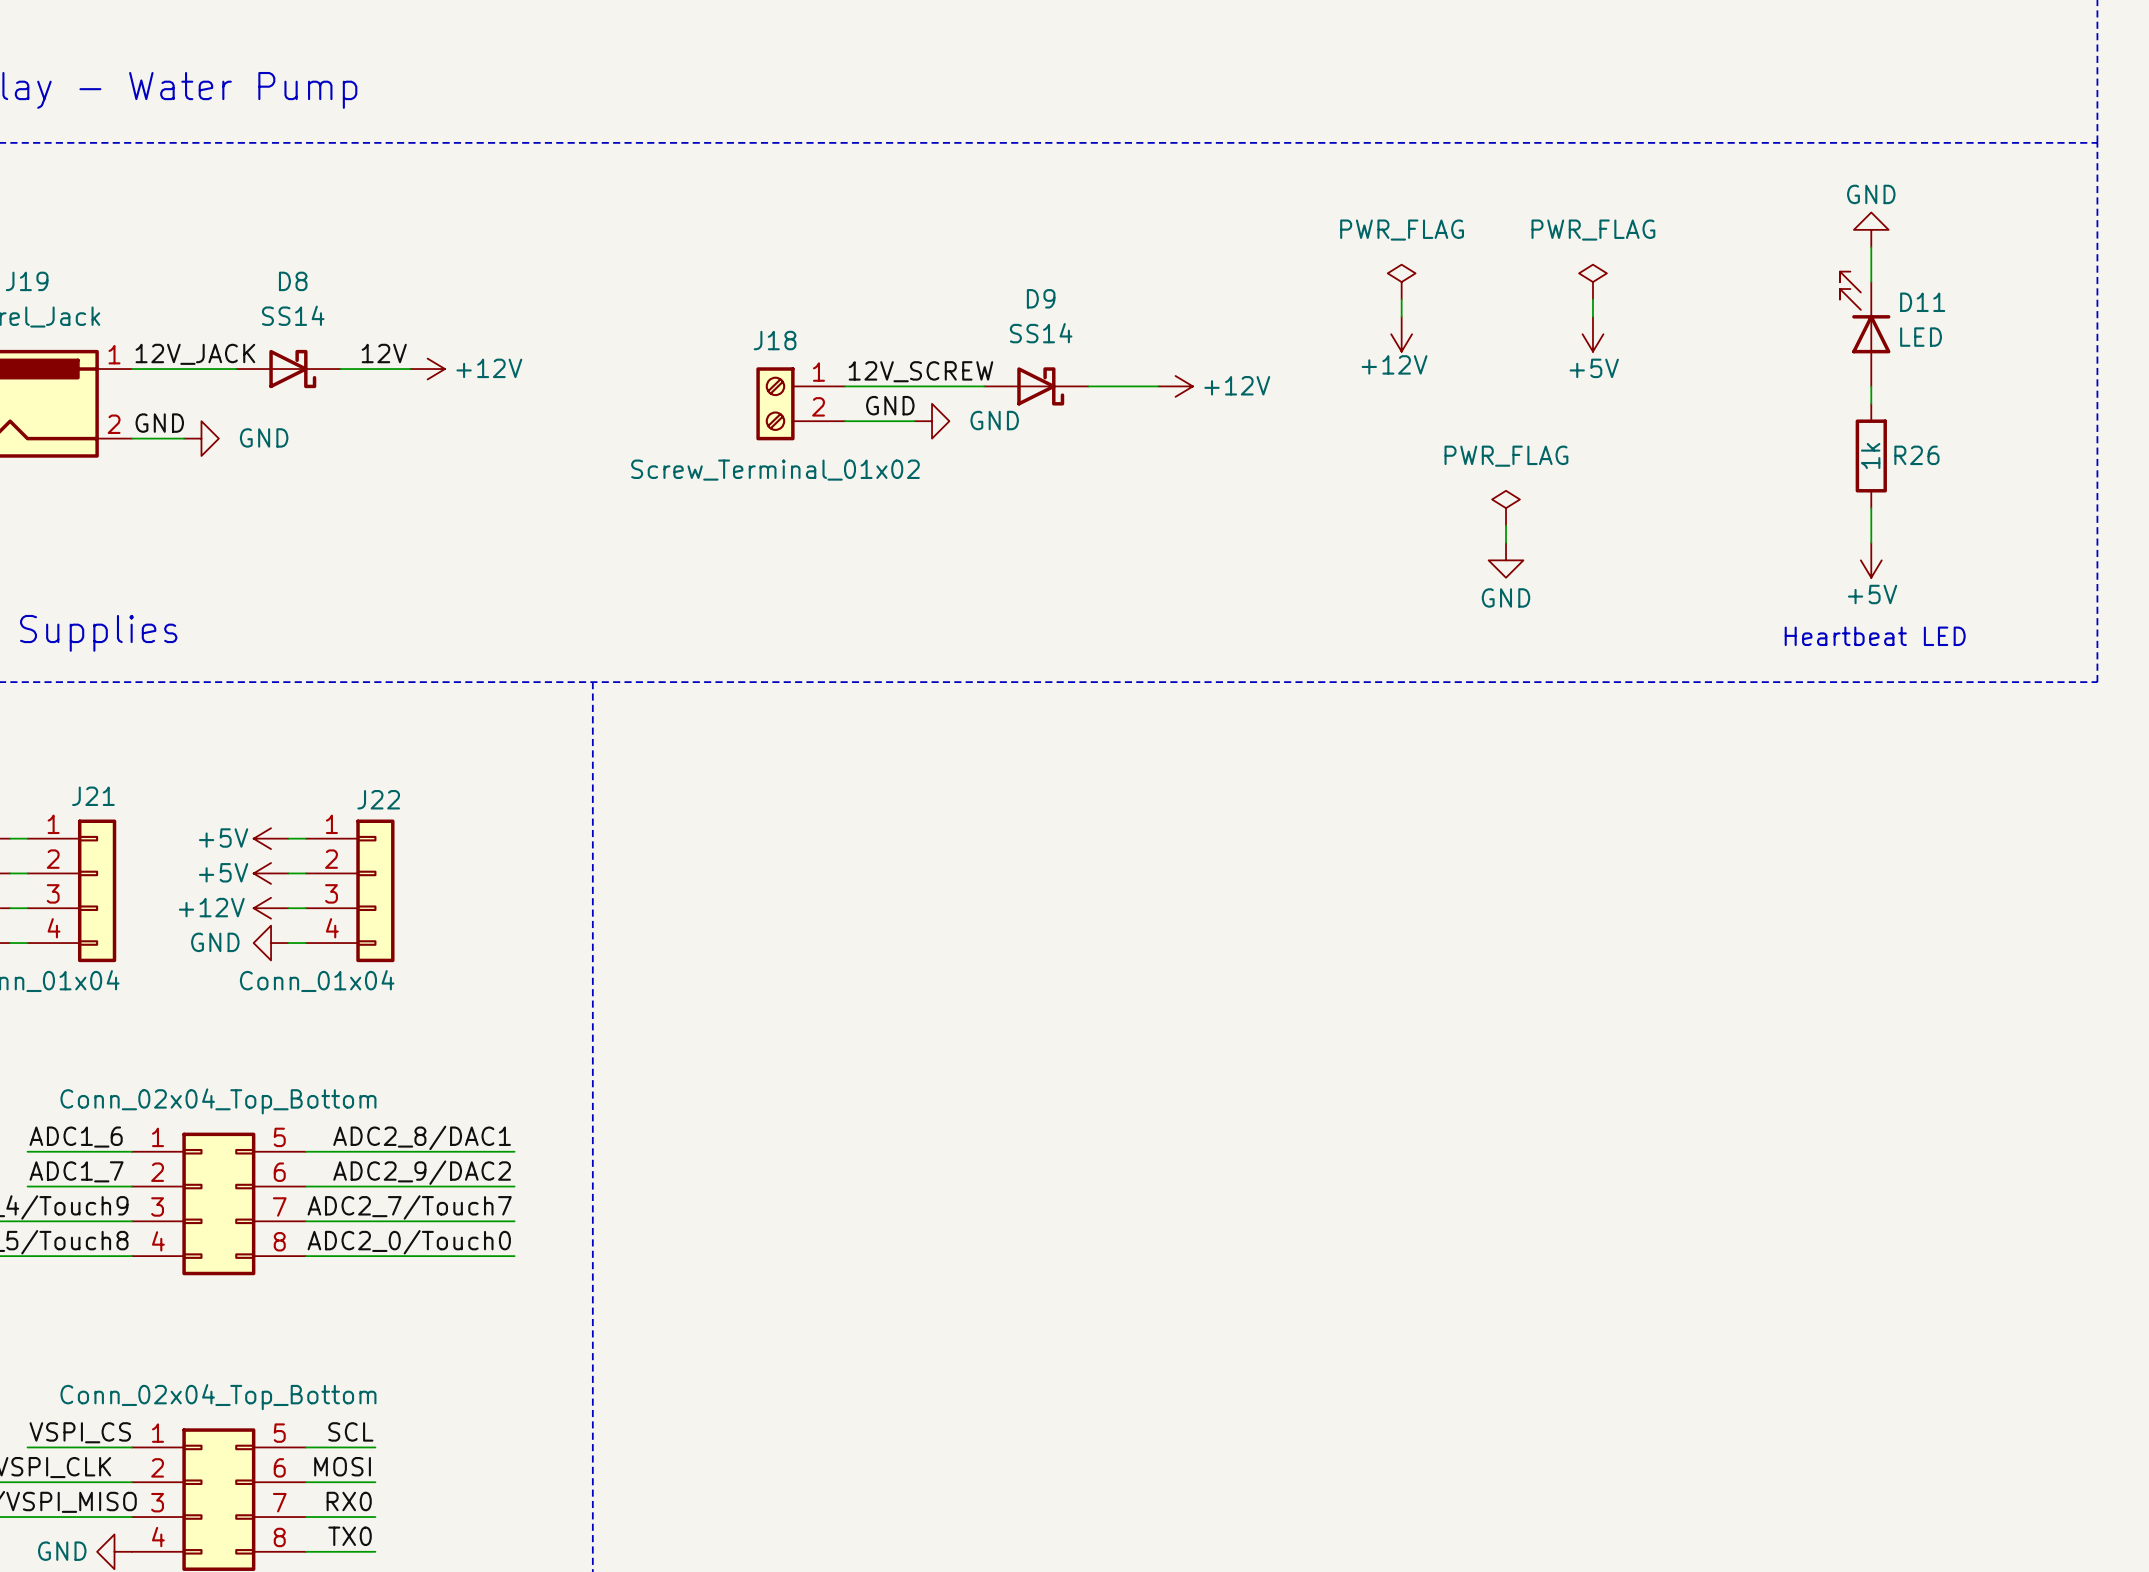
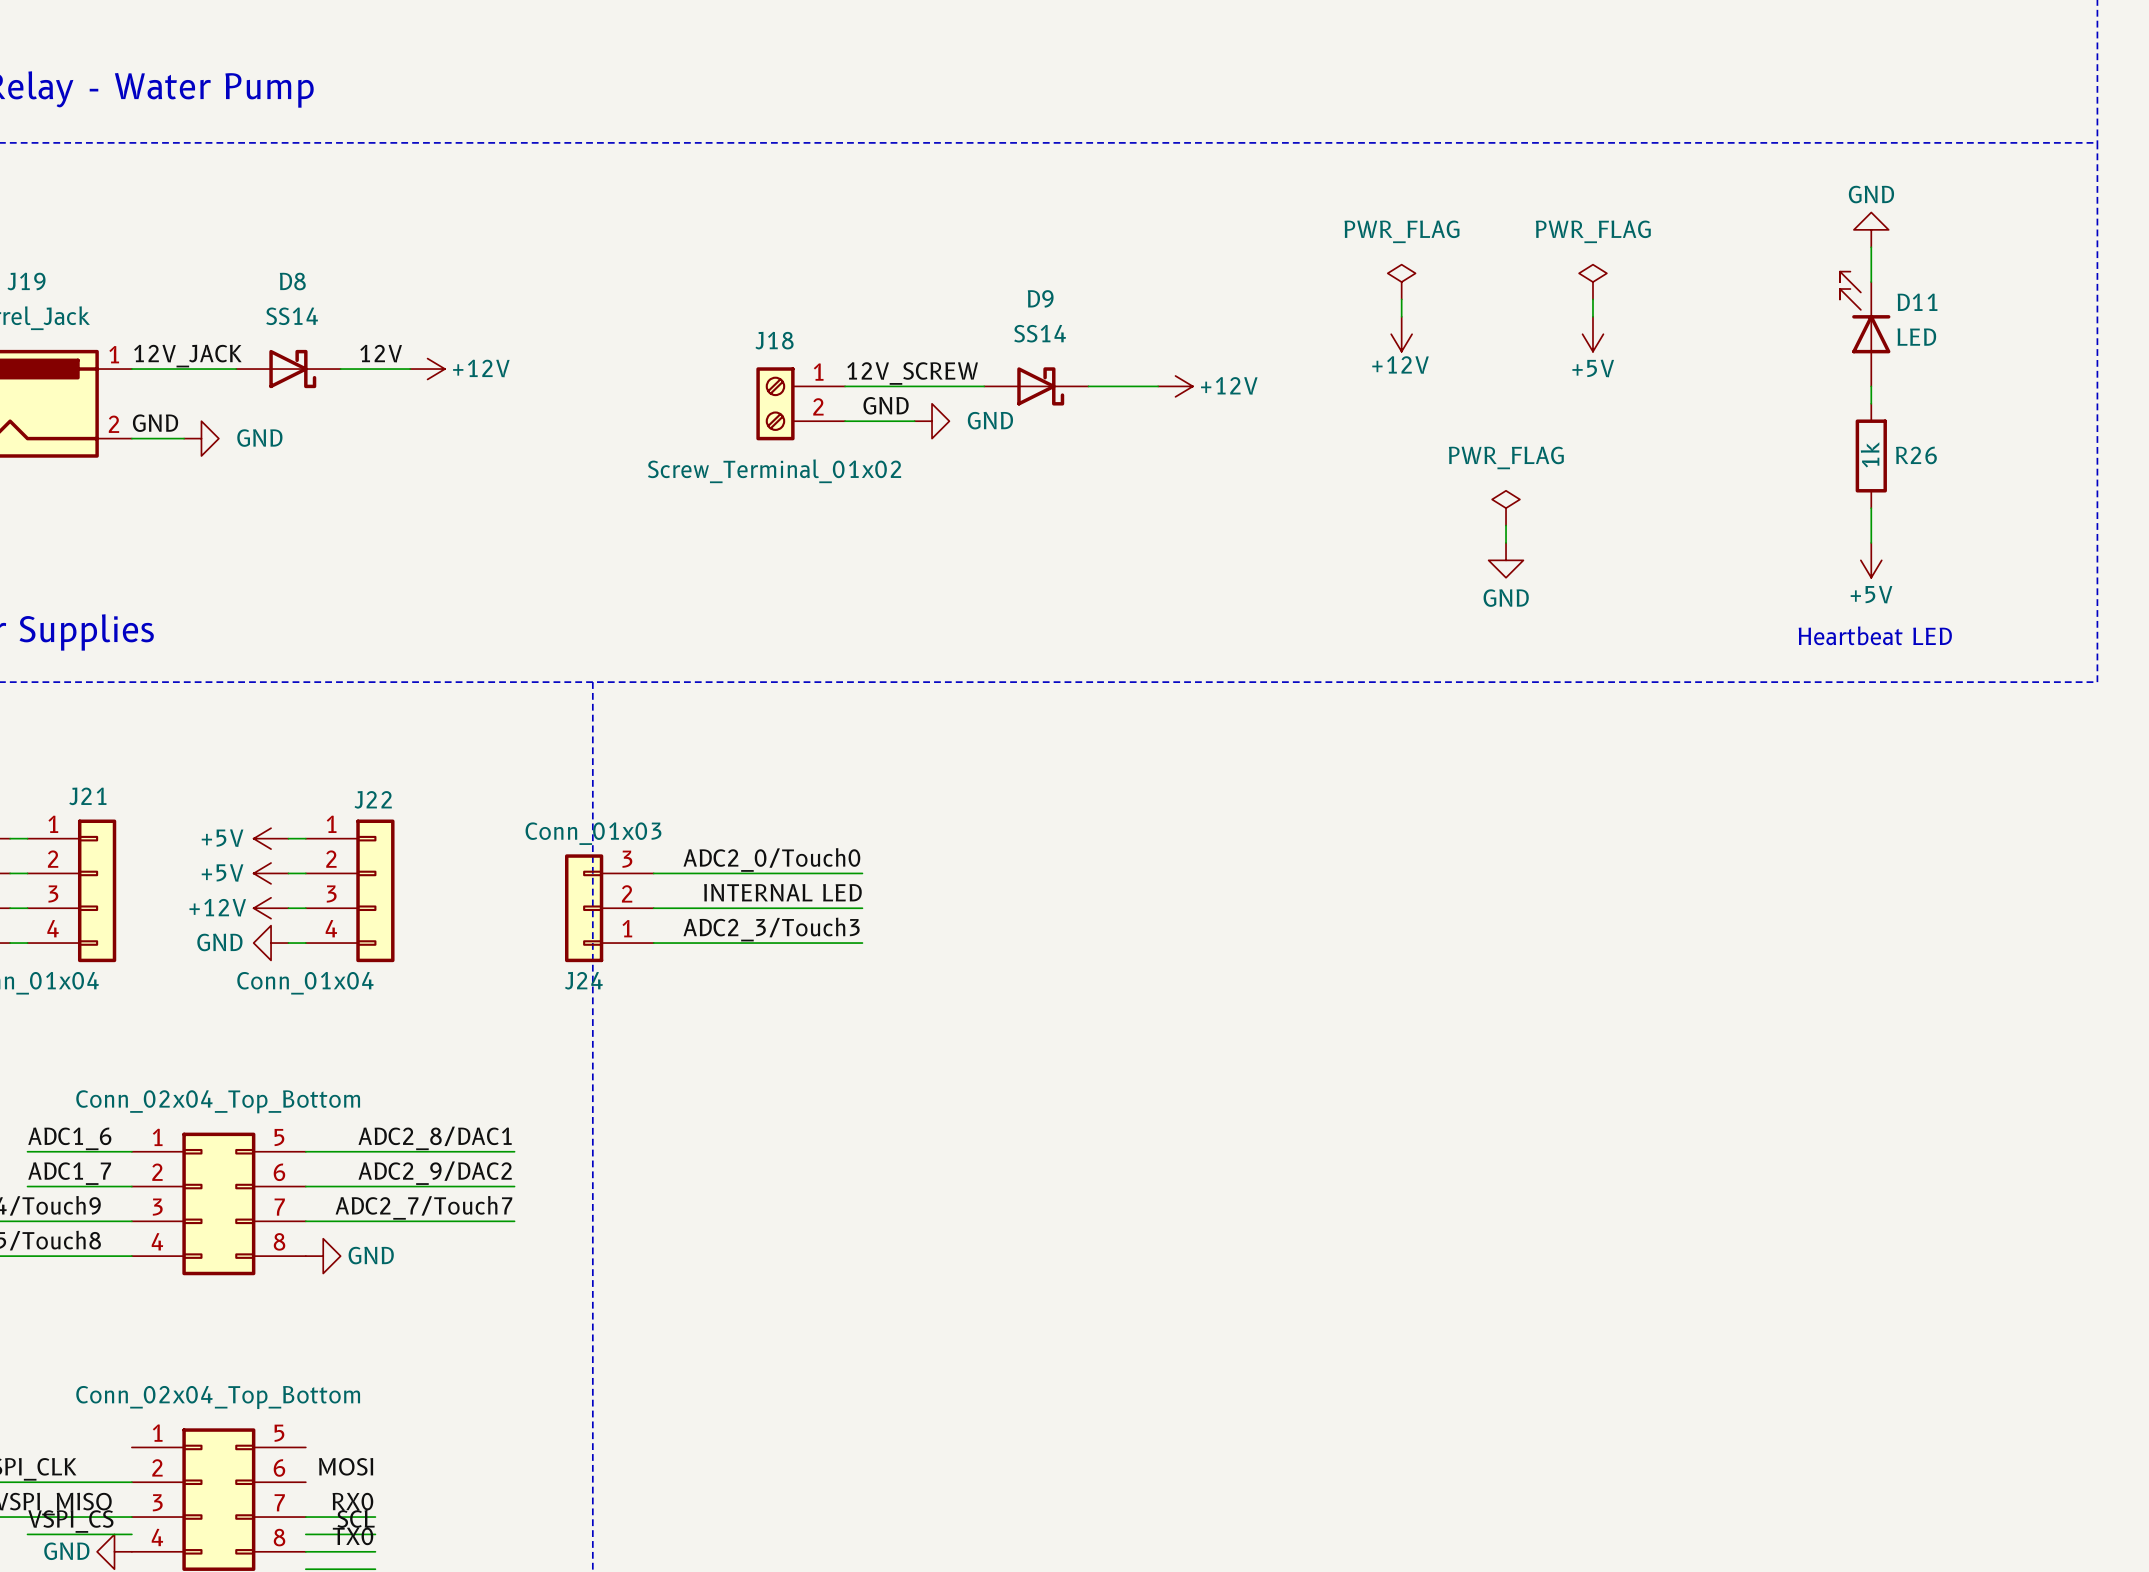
label: none -> ADC2_0/Touch0 (771, 859)
wire: none -> (653, 873) (862, 873)
label: none -> INTERNAL LED (782, 892)
J24: none -> Conn_01x03 (609, 908)
wire: none -> (653, 908) (862, 908)
label: none -> ADC2_3/Touch3 (771, 929)
wire: none -> (653, 943) (862, 943)
label: ADC2_0/Touch0 (409, 1242) -> none
wire: (305, 1256) (514, 1256) -> none
power symbol: none -> GND (323, 1256)
label position: SCL (350, 1431) -> SCL (356, 1518)
label position: VSPI_CS (80, 1432) -> VSPI_CS (70, 1521)
wire: (27, 1447) (131, 1447) -> (27, 1534) (131, 1534)
wire: (305, 1447) (375, 1447) -> (305, 1534) (375, 1534)
wire: (305, 1482) (375, 1482) -> (305, 1569) (375, 1569)

